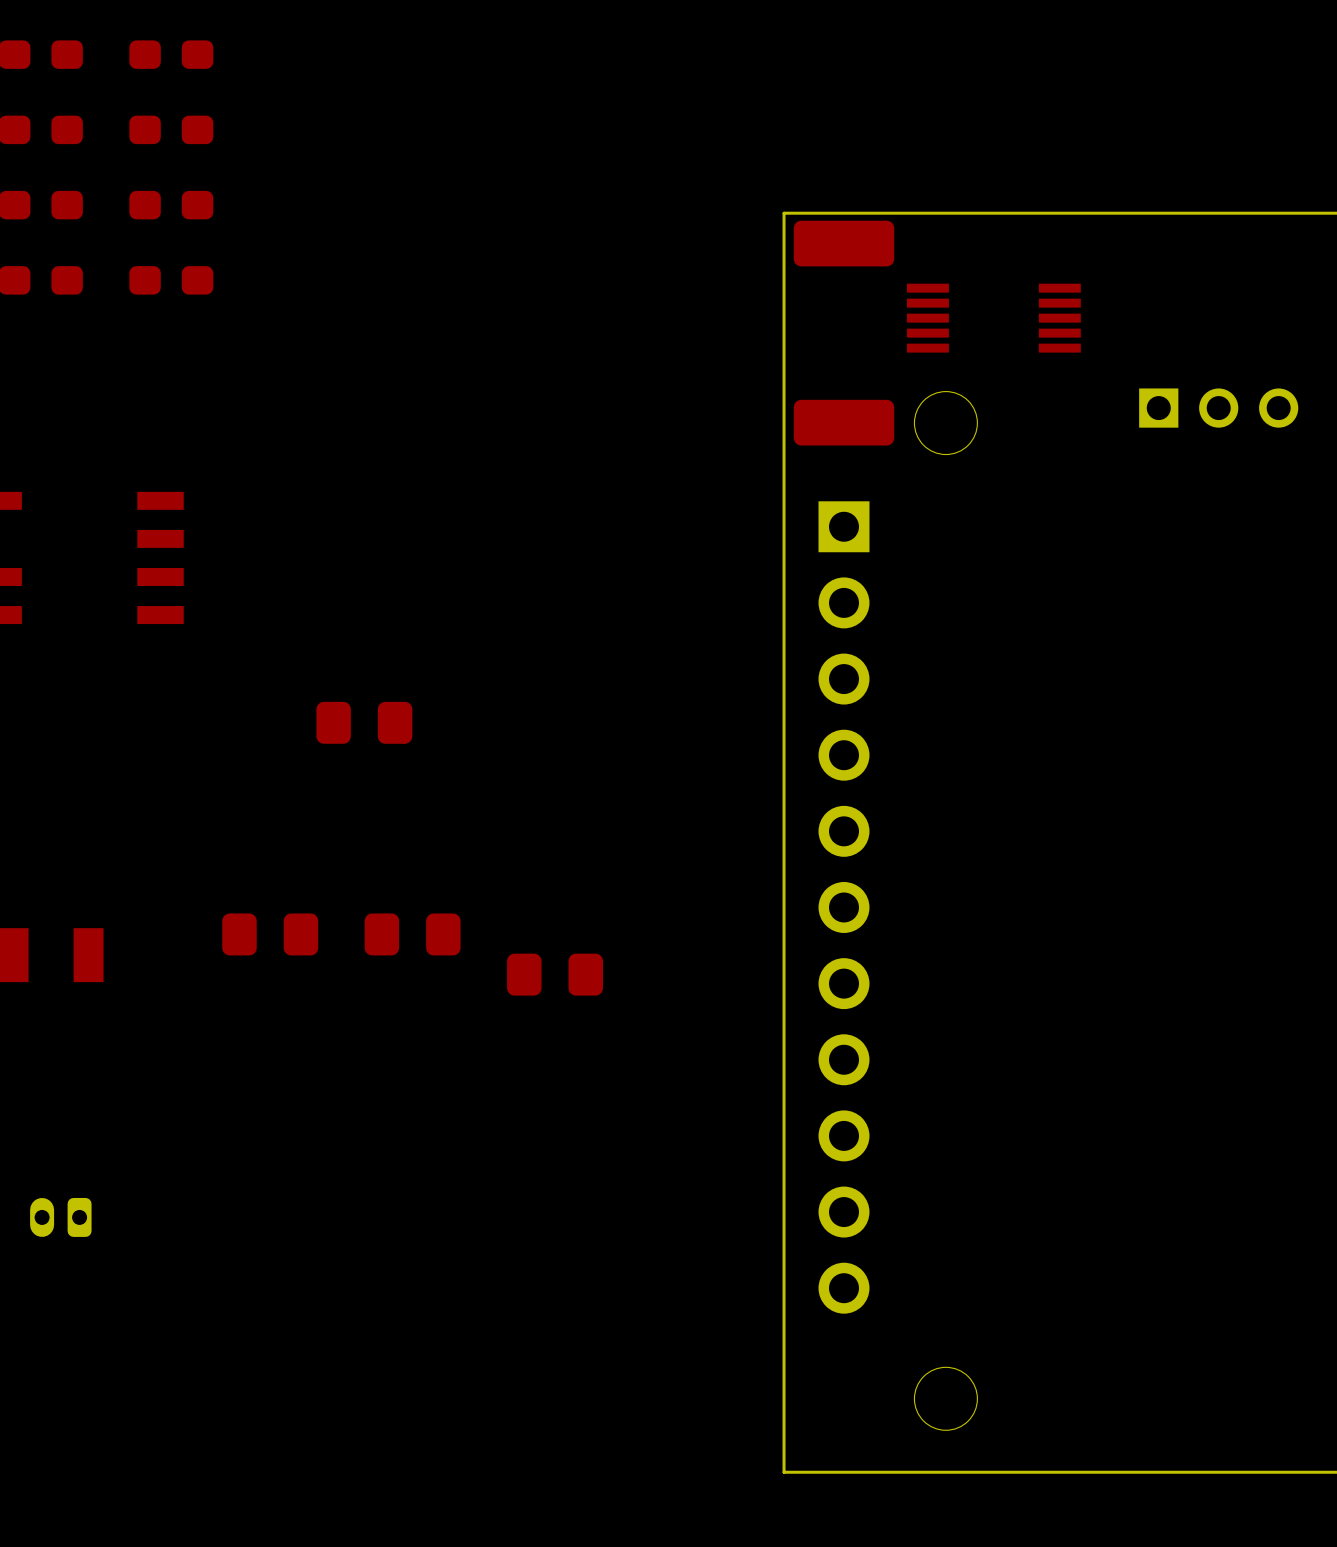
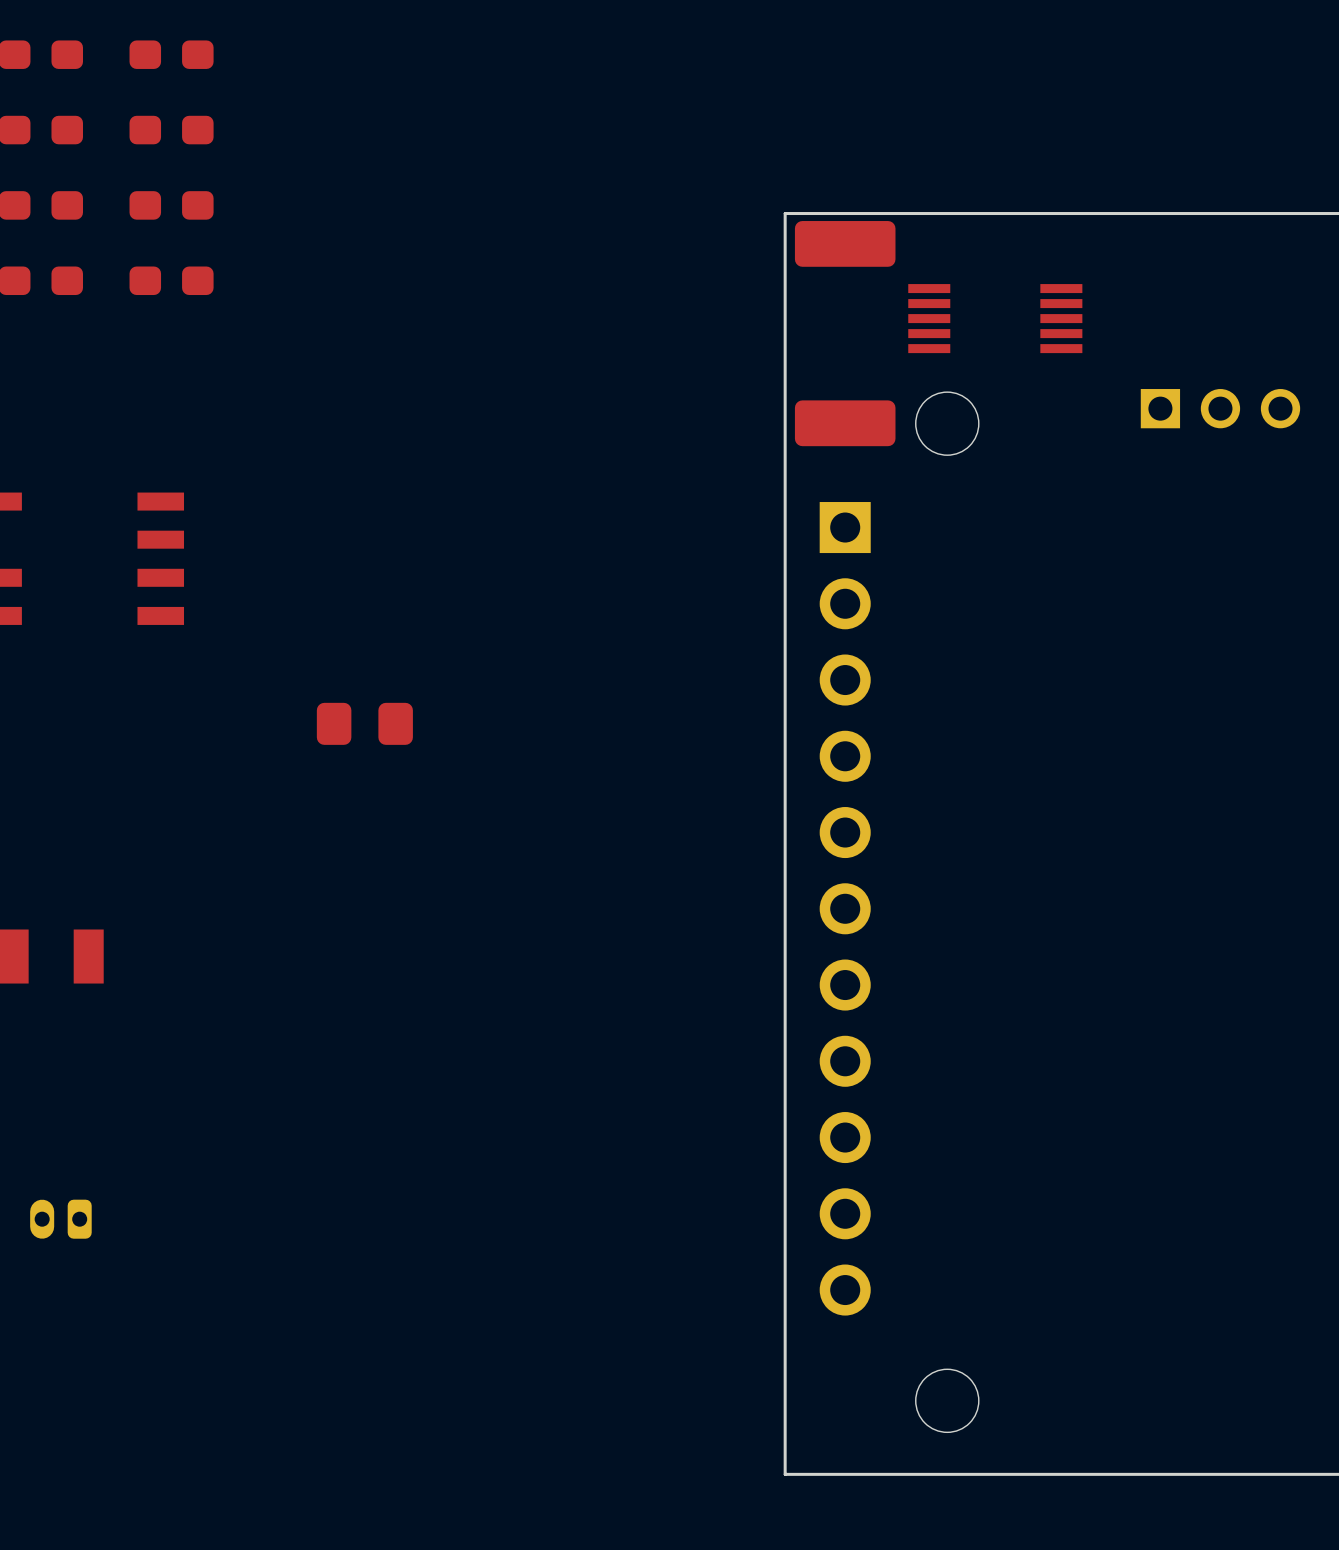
part: (270, 934) -> none
part: (412, 934) -> none
part: (555, 974) -> none

